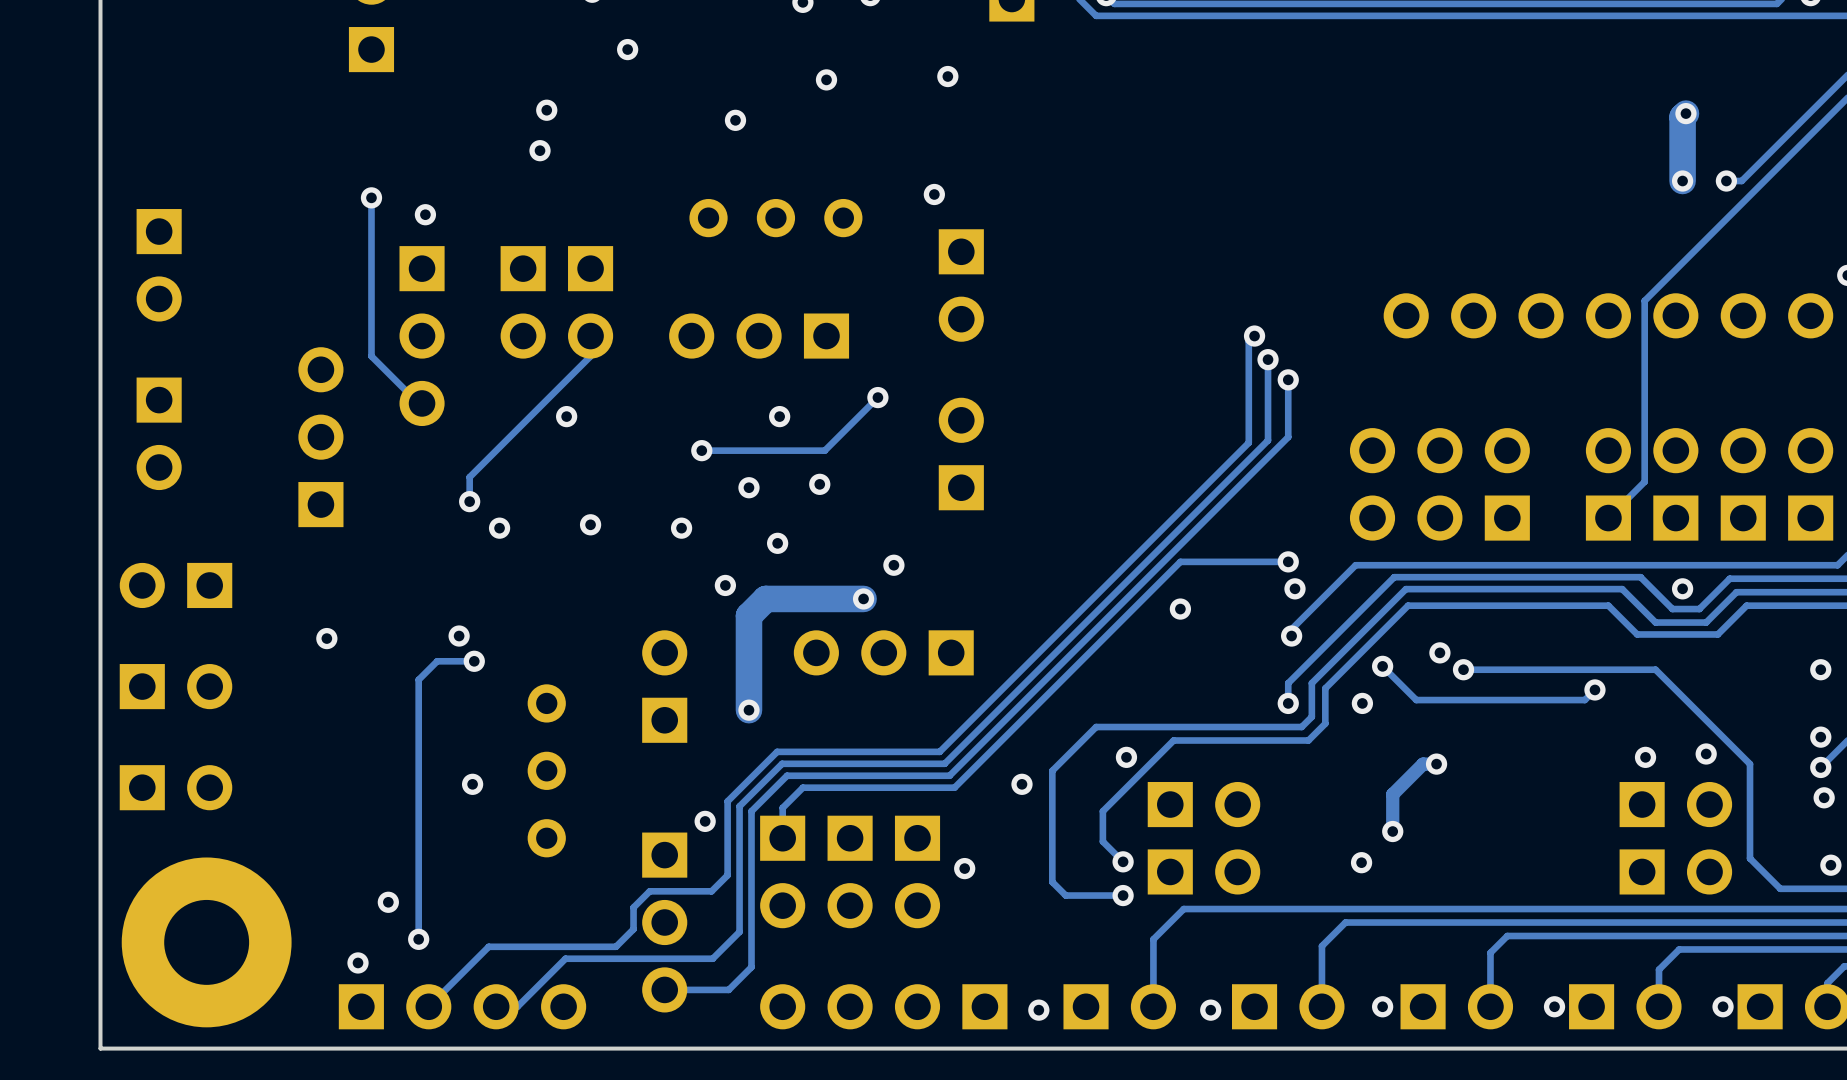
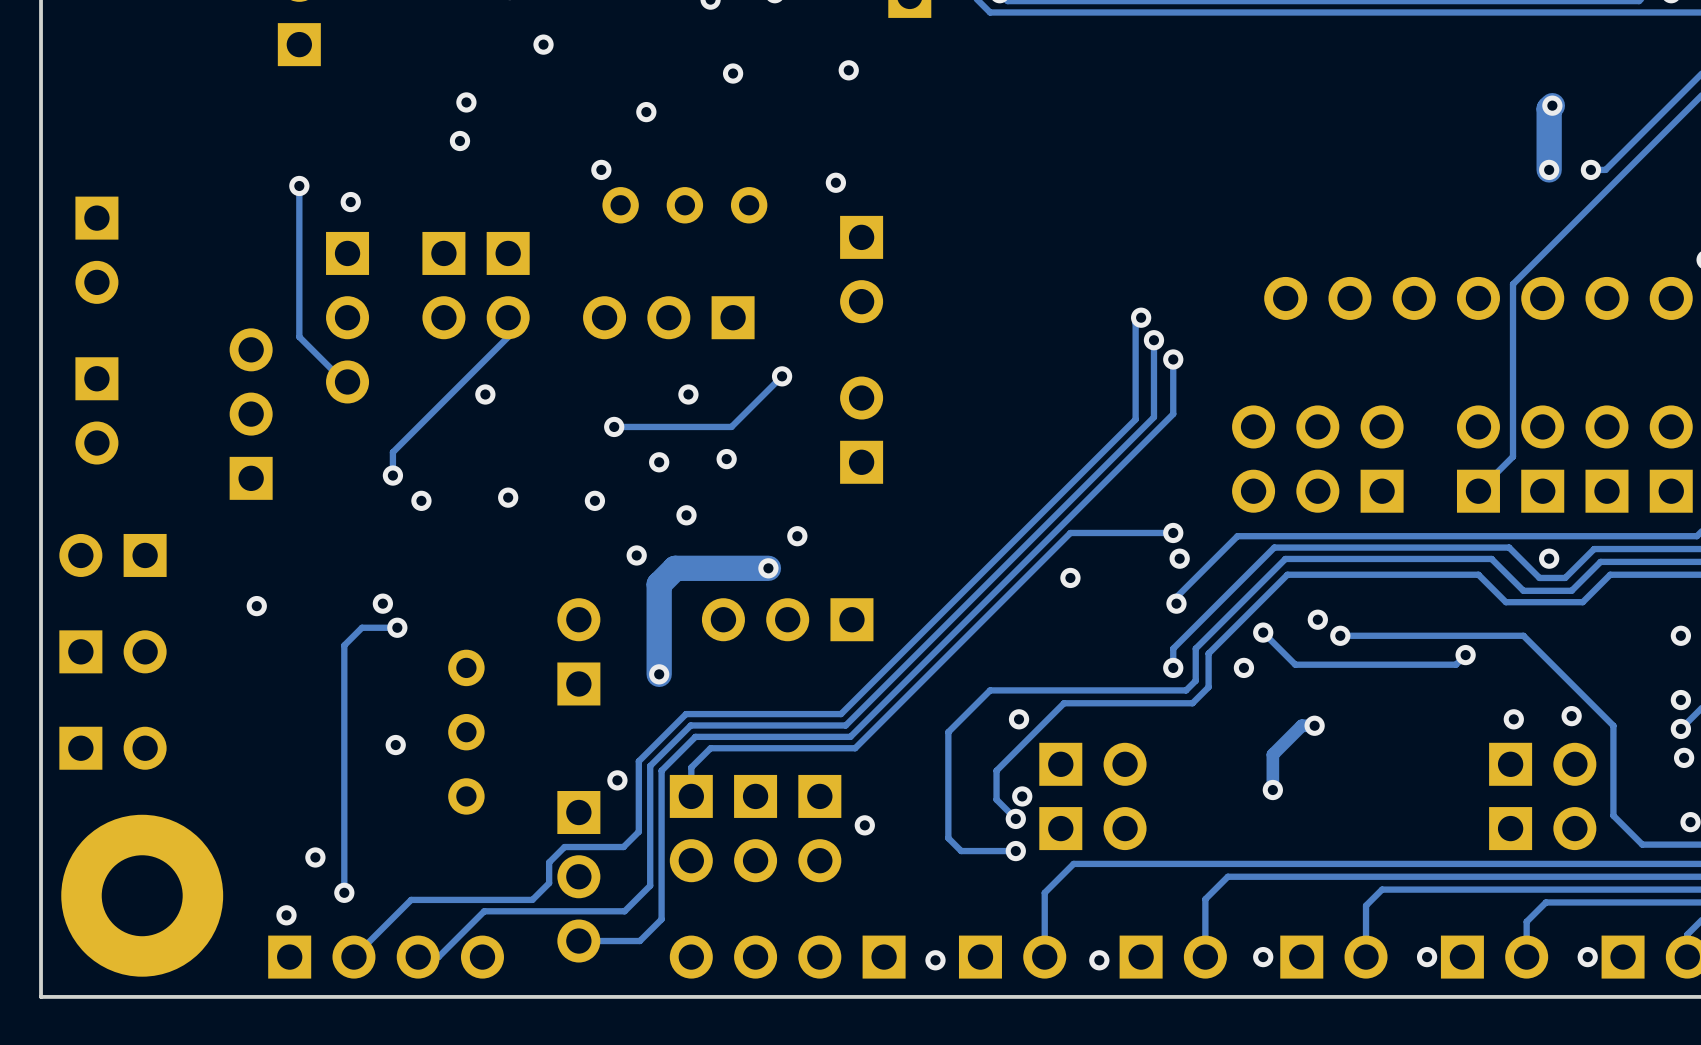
via: none -> (601, 169)
via: (1021, 784) -> none
via: none -> (1022, 796)
via: (1361, 862) -> none

